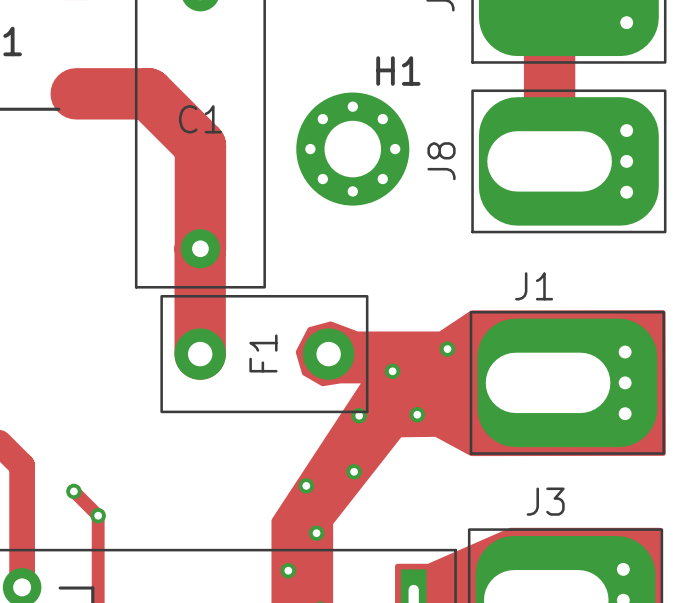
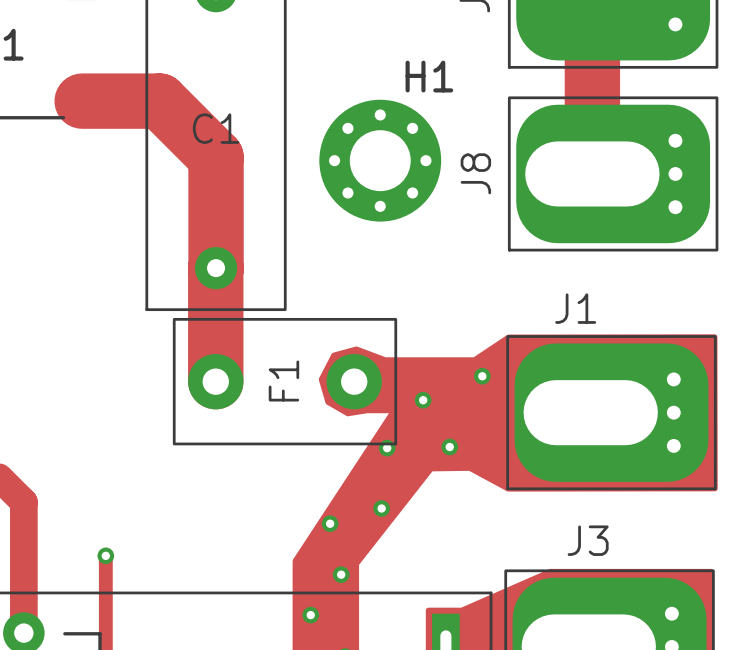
track: (73, 491) (98, 515) -> none
via: (73, 491) -> none

